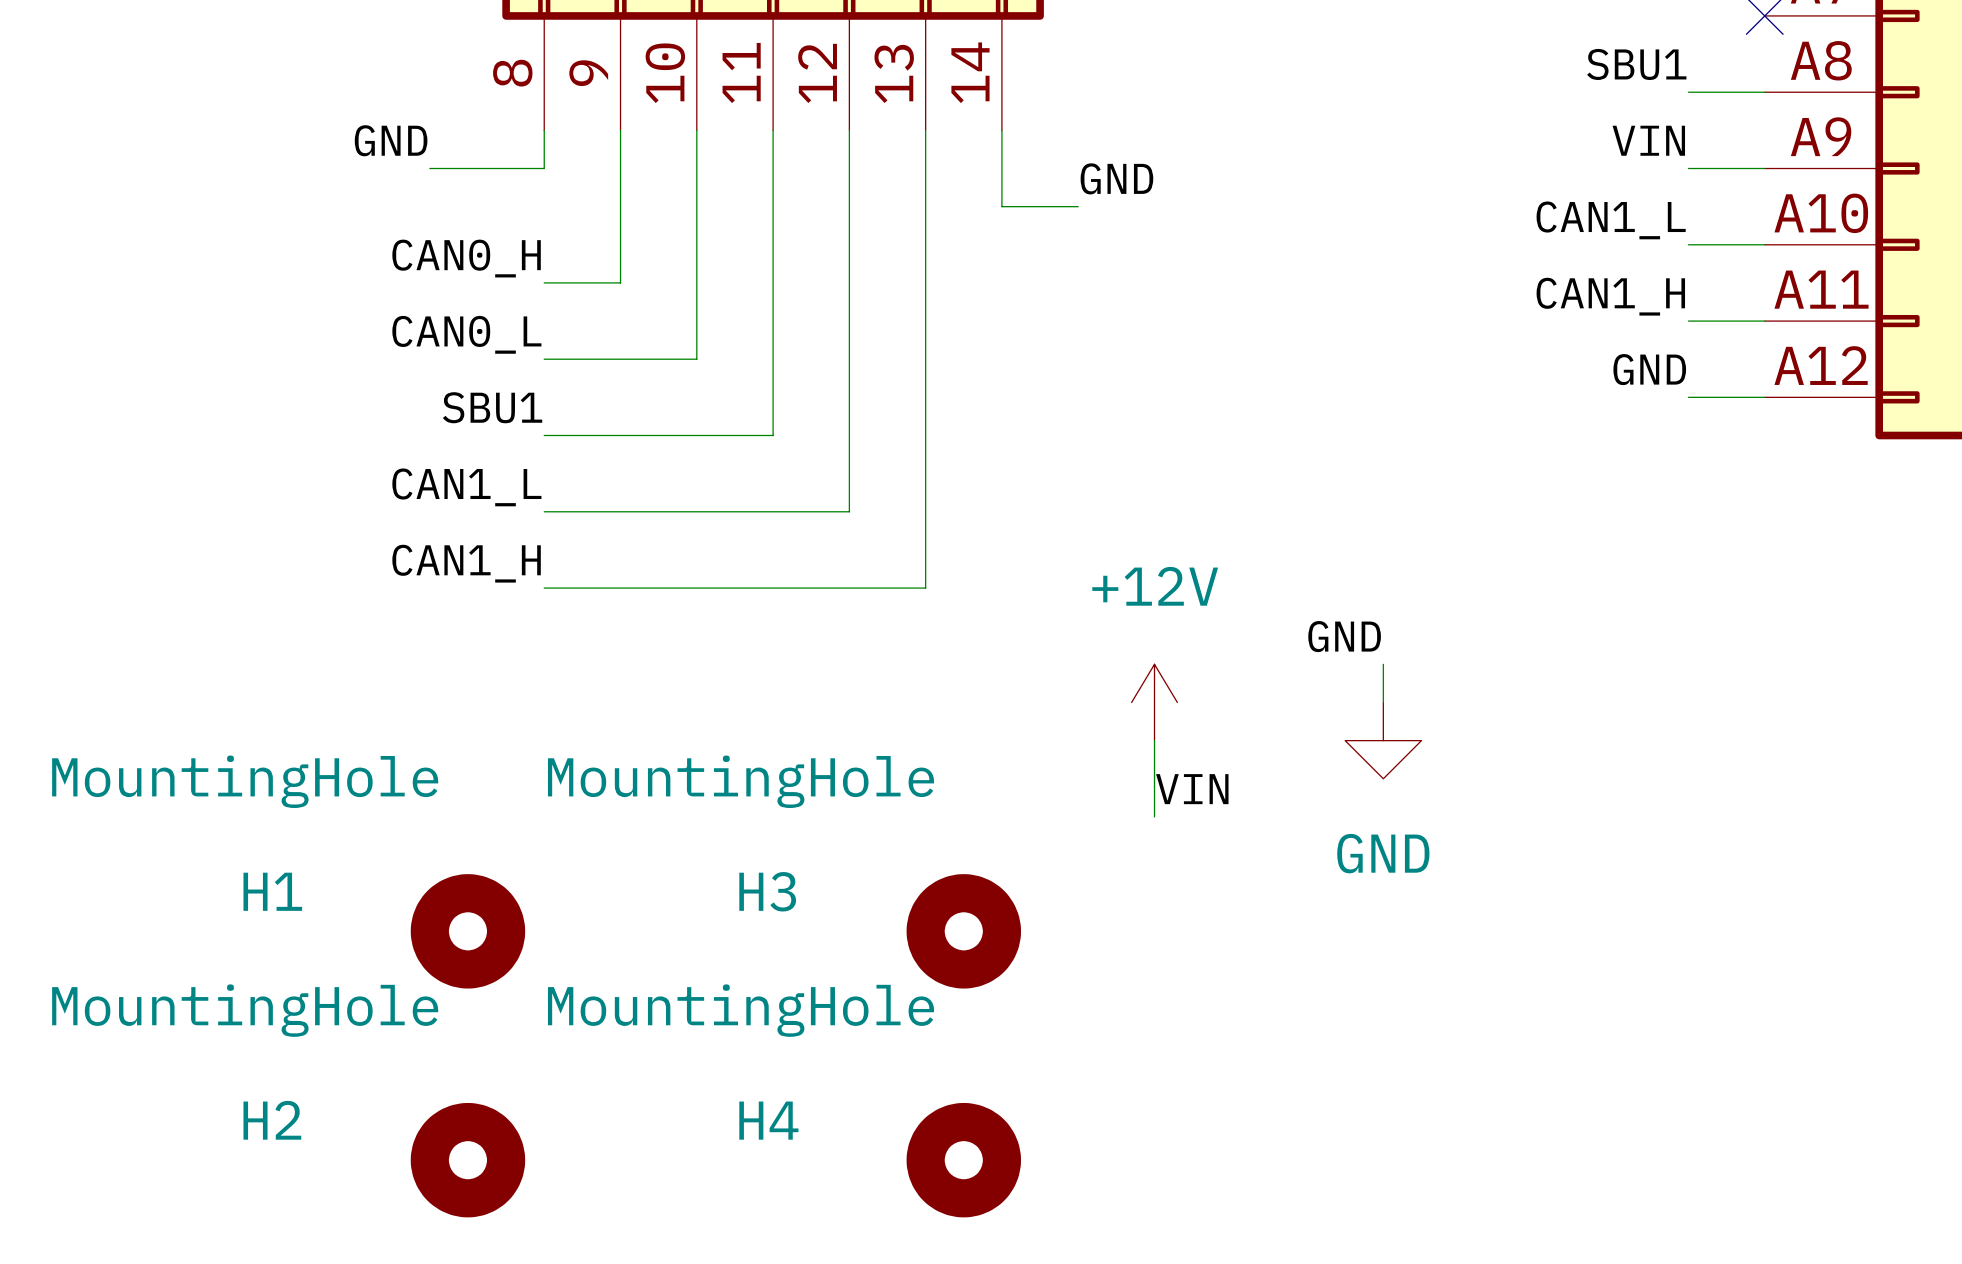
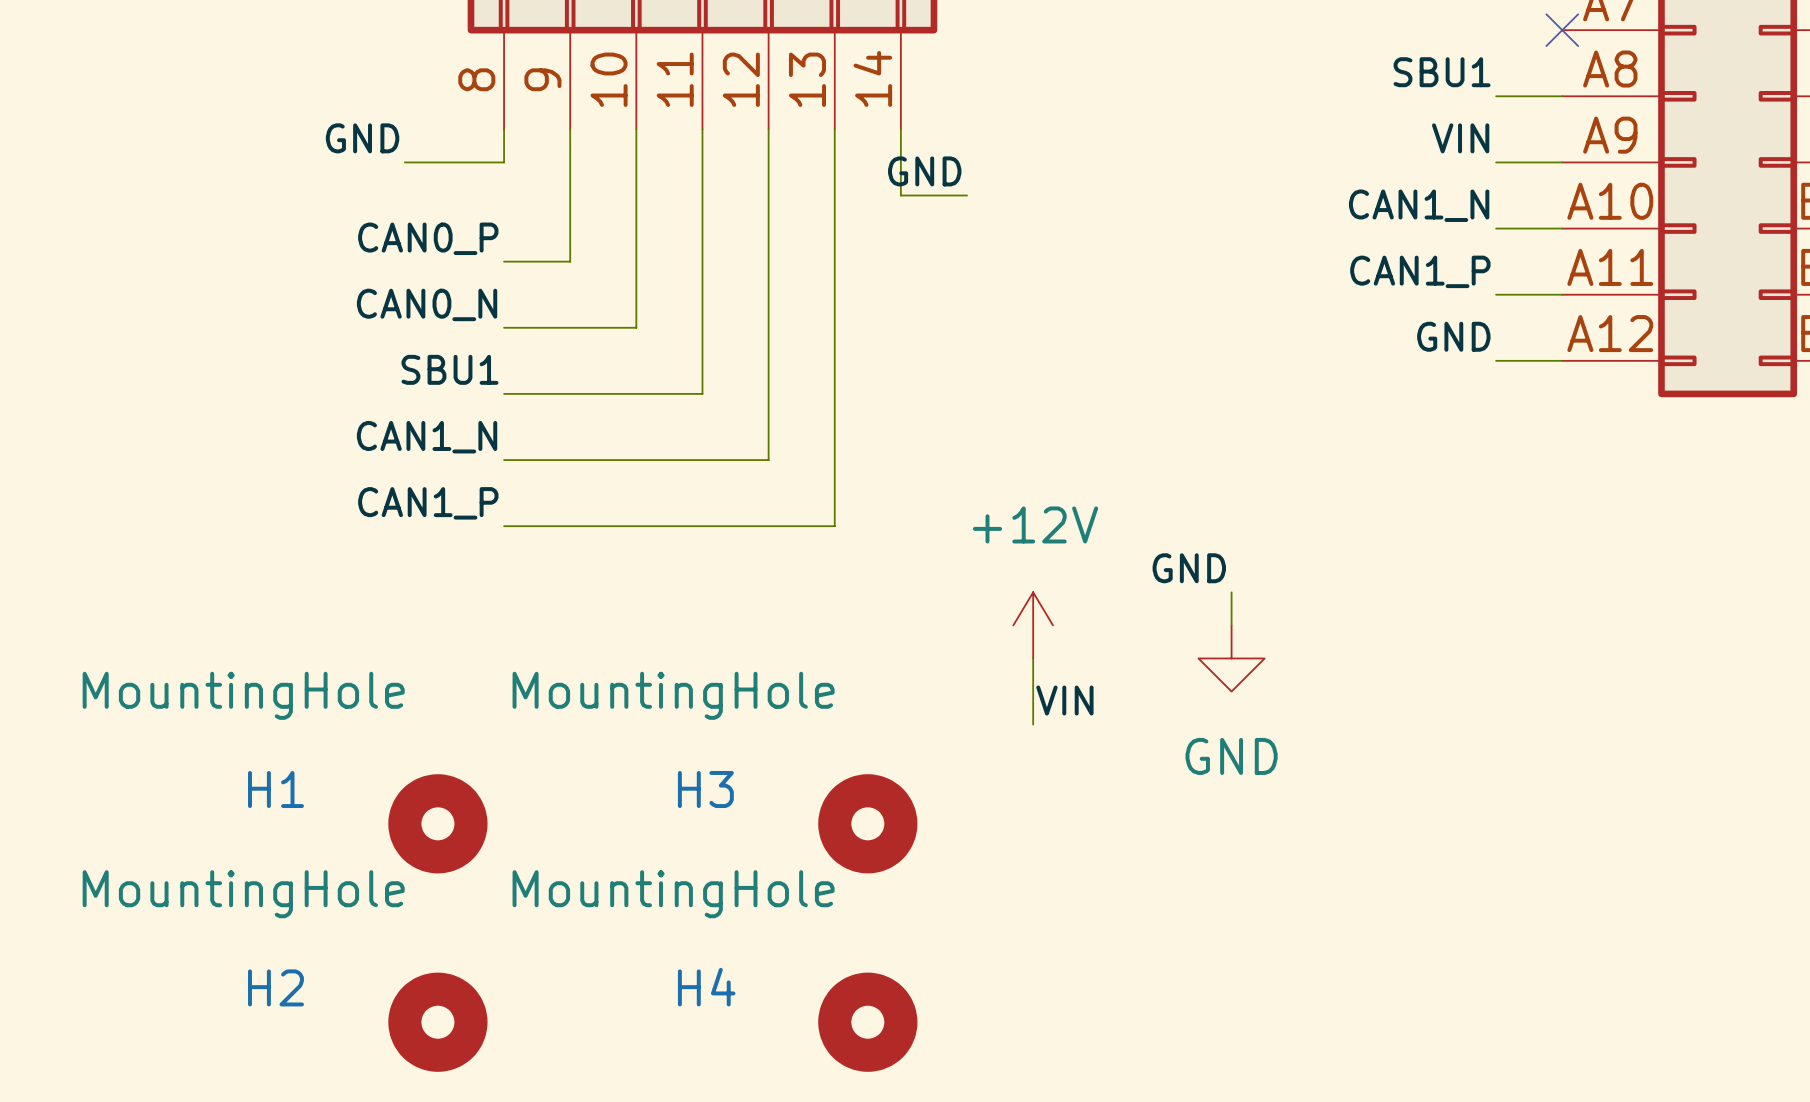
label position: GND (1116, 178) -> GND (924, 171)
label: CAN1_L (1611, 220) -> CAN1_N (1419, 205)
label: CAN0_H (466, 258) -> CAN0_P (428, 238)
label: CAN1_H (1610, 296) -> CAN1_P (1420, 271)
label: CAN0_L (466, 334) -> CAN0_N (427, 304)
label: CAN1_L (466, 487) -> CAN1_N (427, 437)
label: CAN1_H (466, 563) -> CAN1_P (428, 503)

